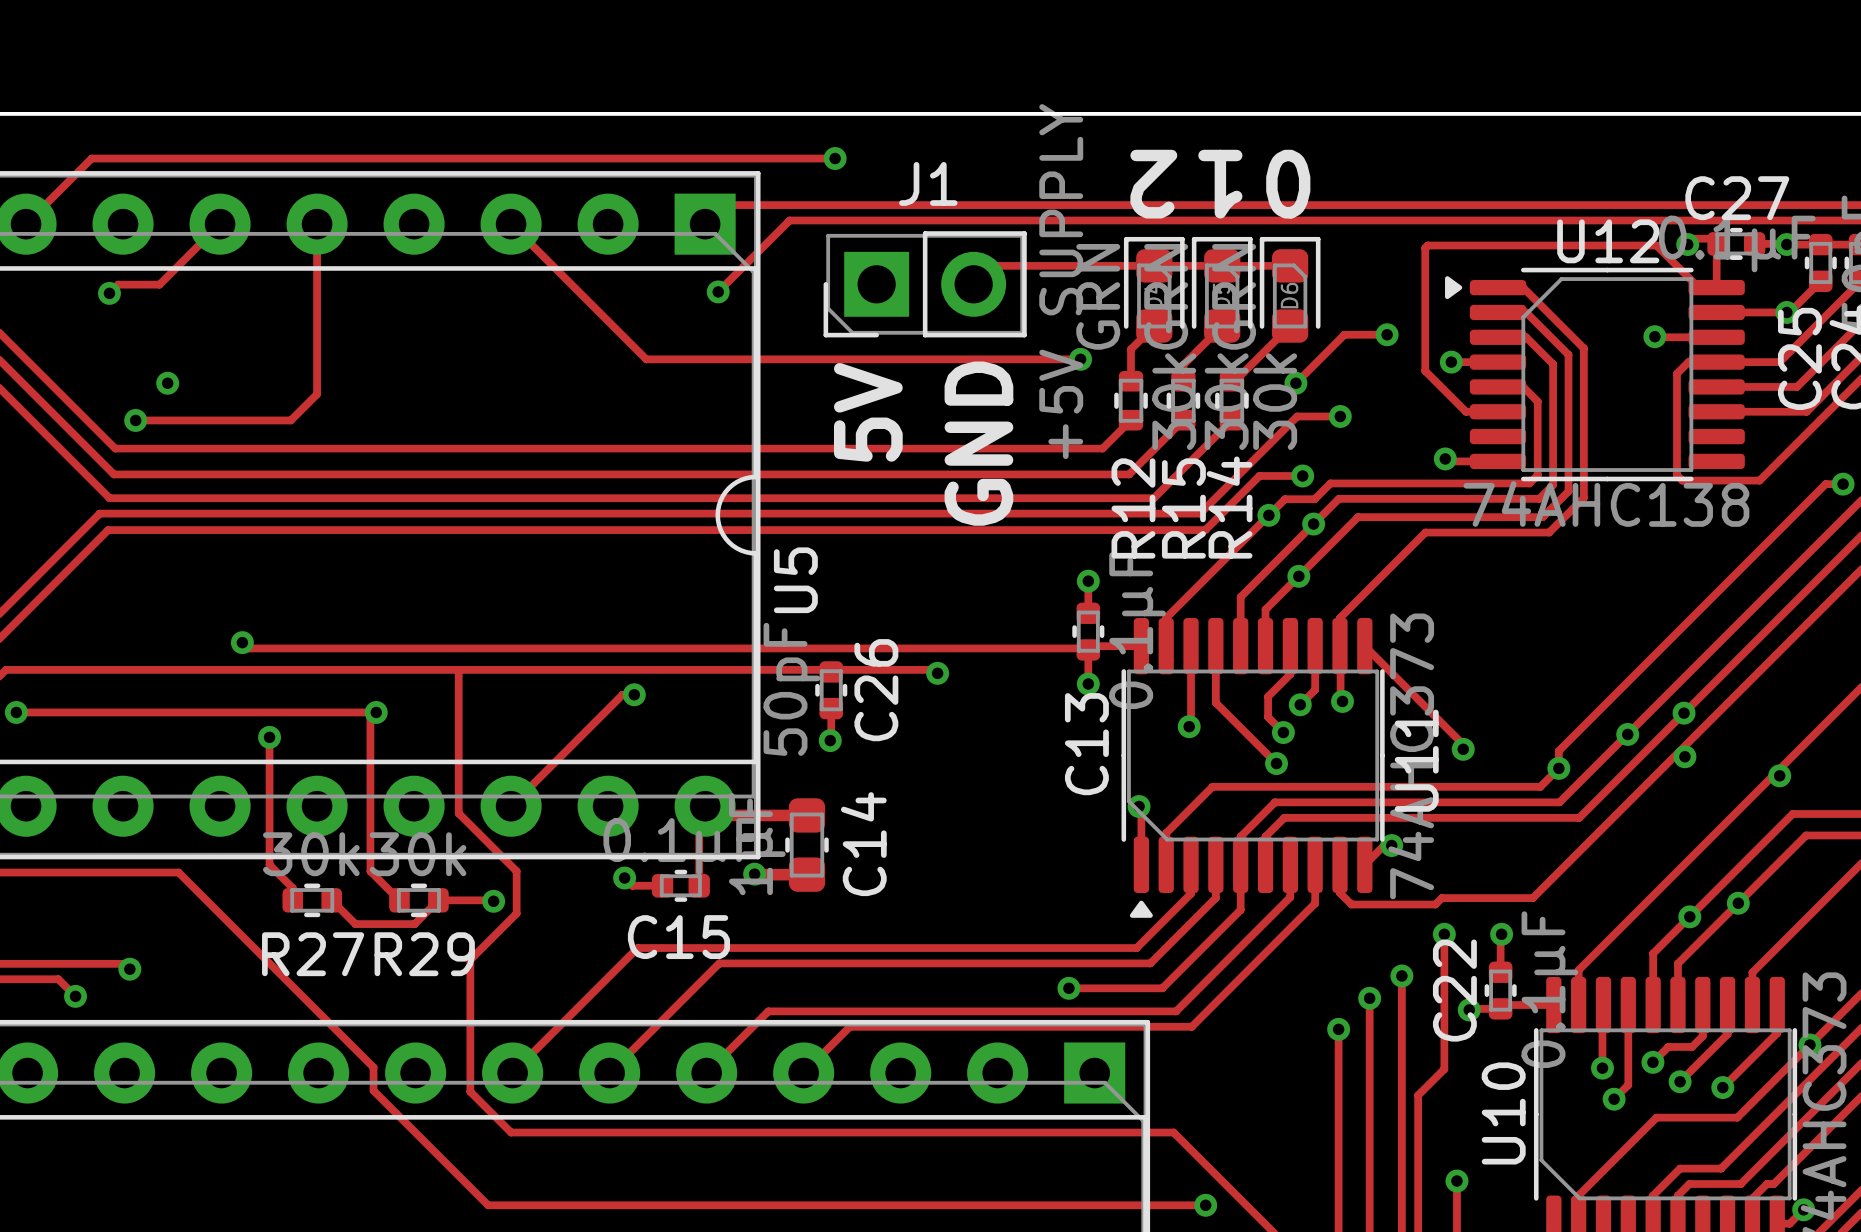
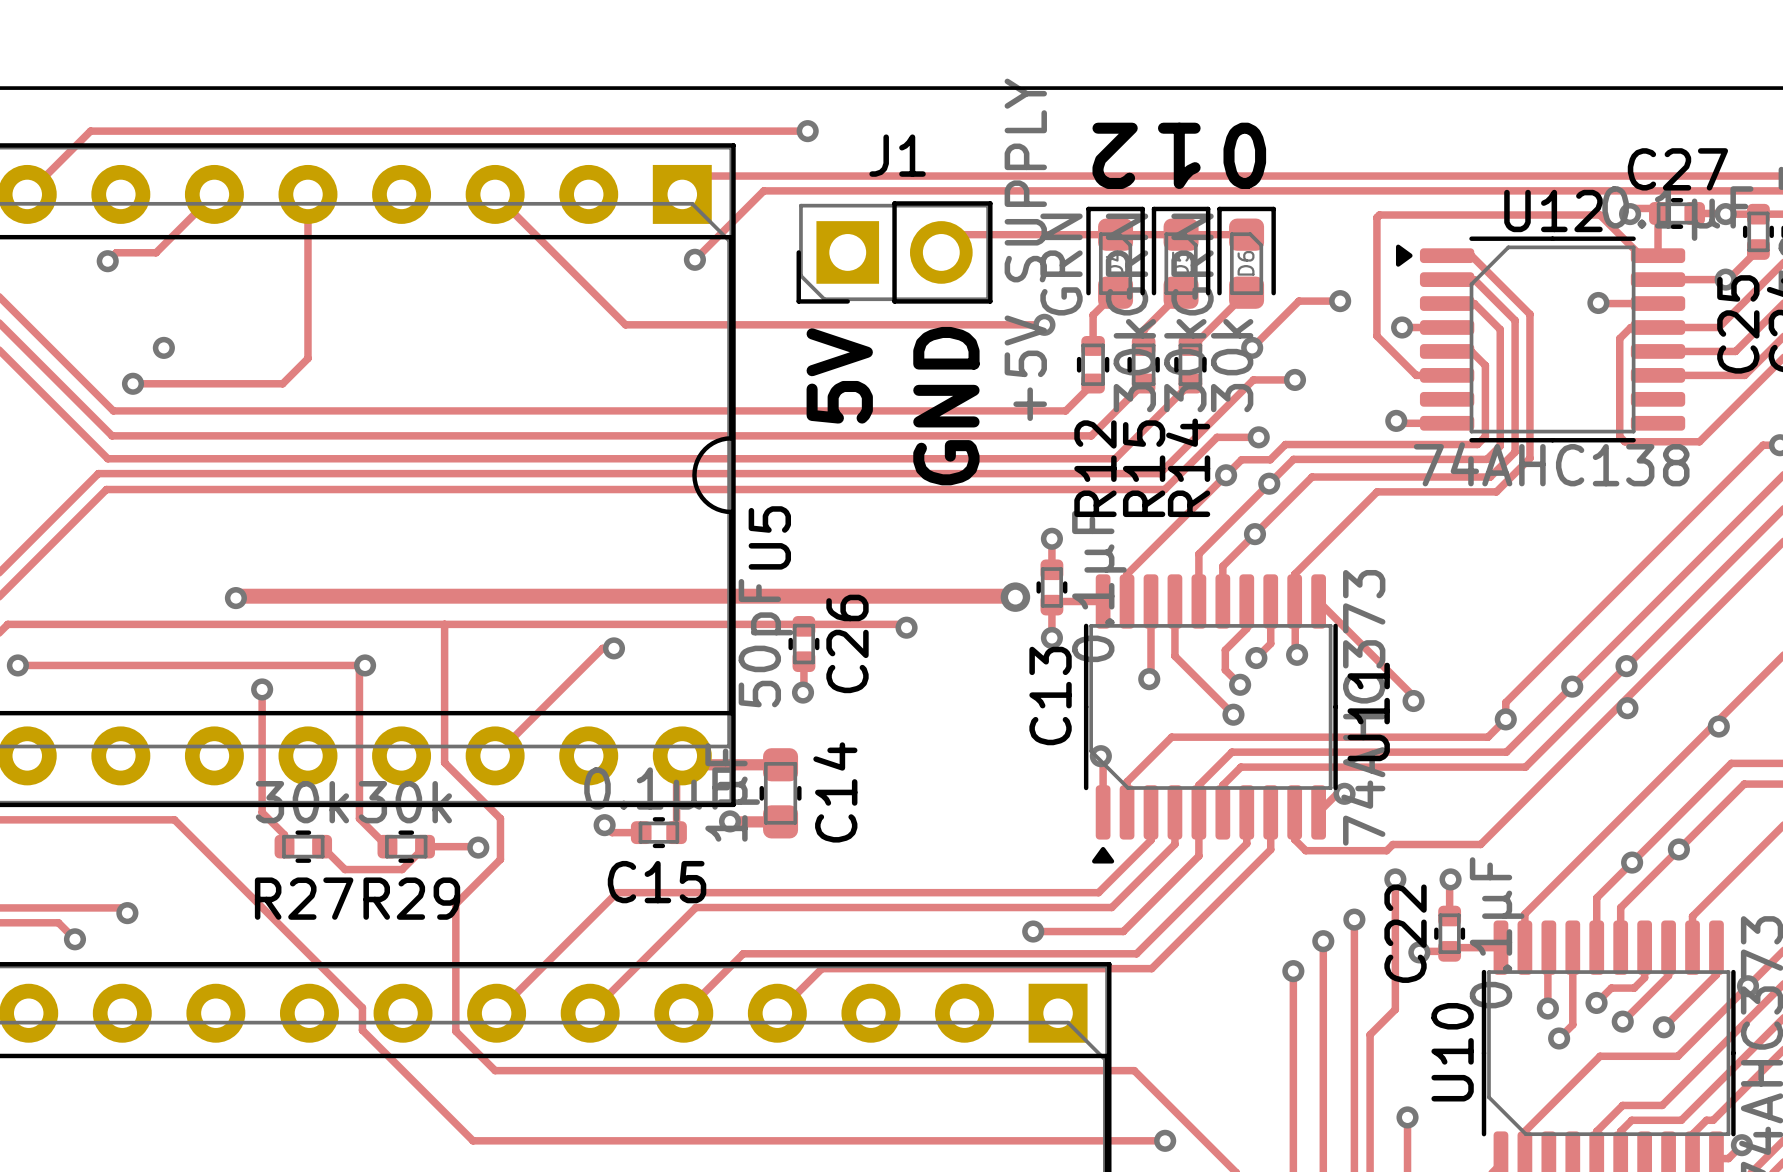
via: none -> (1015, 597)
track: (242, 642) (248, 648) (1086, 648) (1088, 649) -> (235, 598) (237, 596) (1015, 597)

